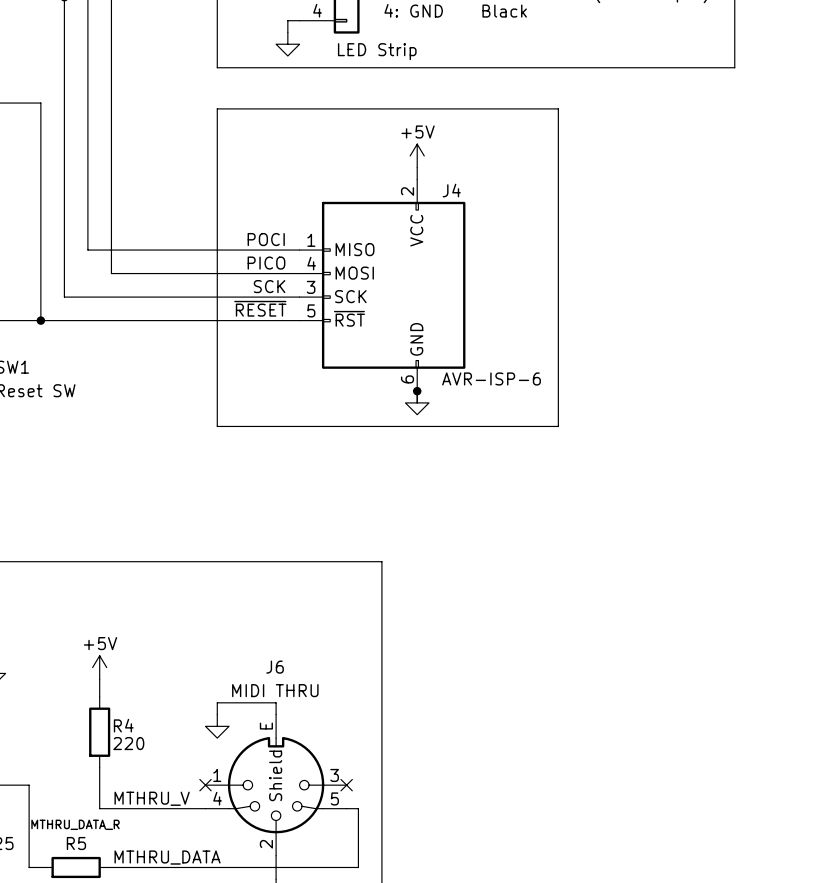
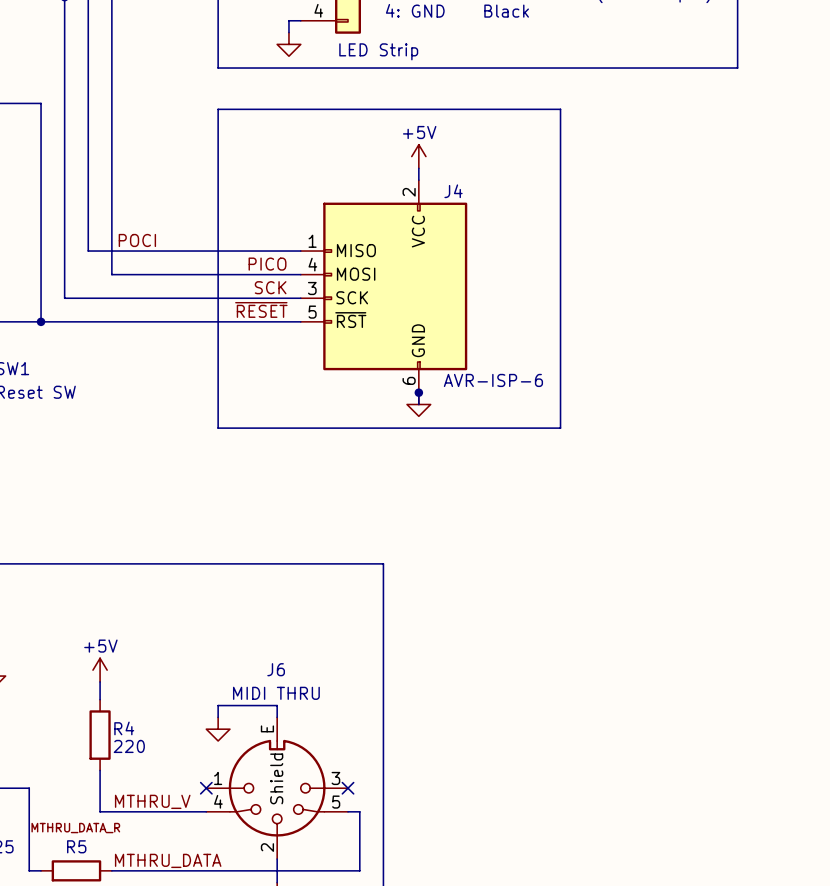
label position: POCI (266, 239) -> POCI (137, 240)

